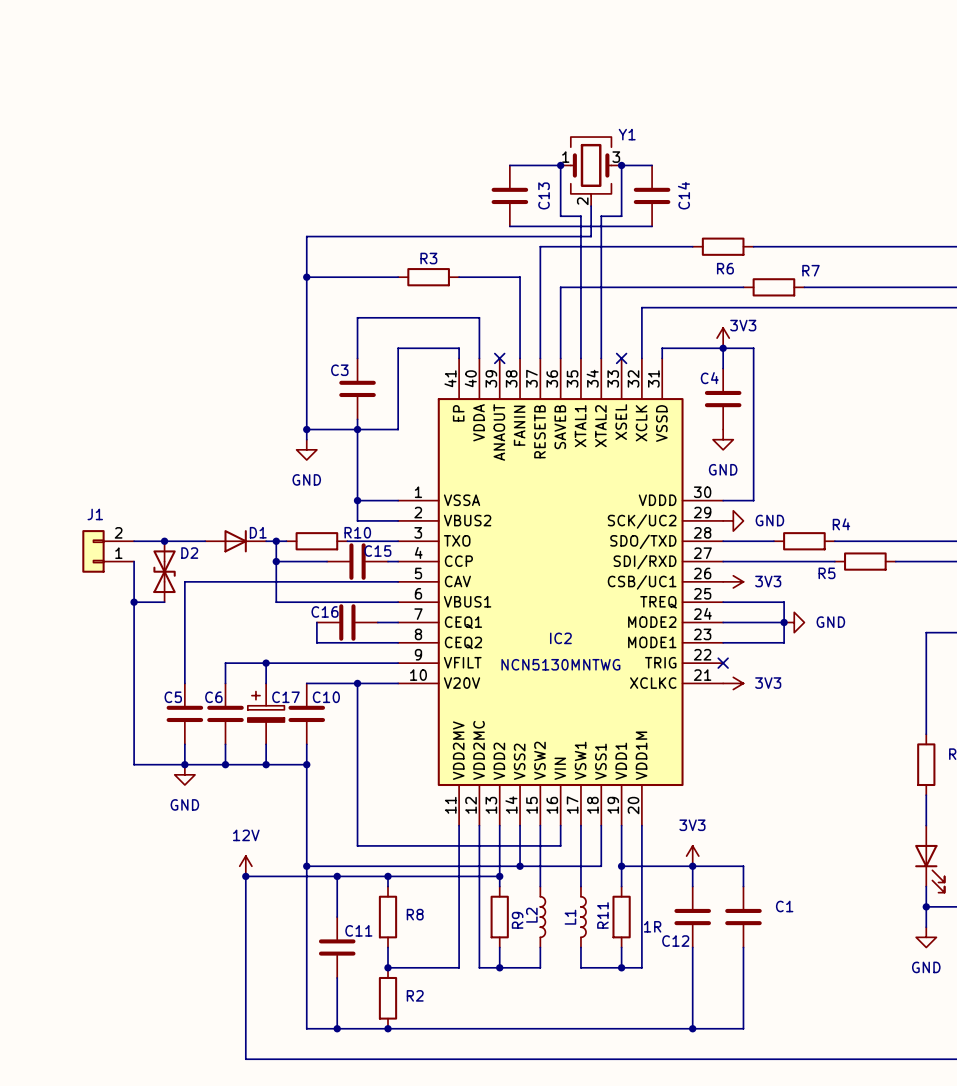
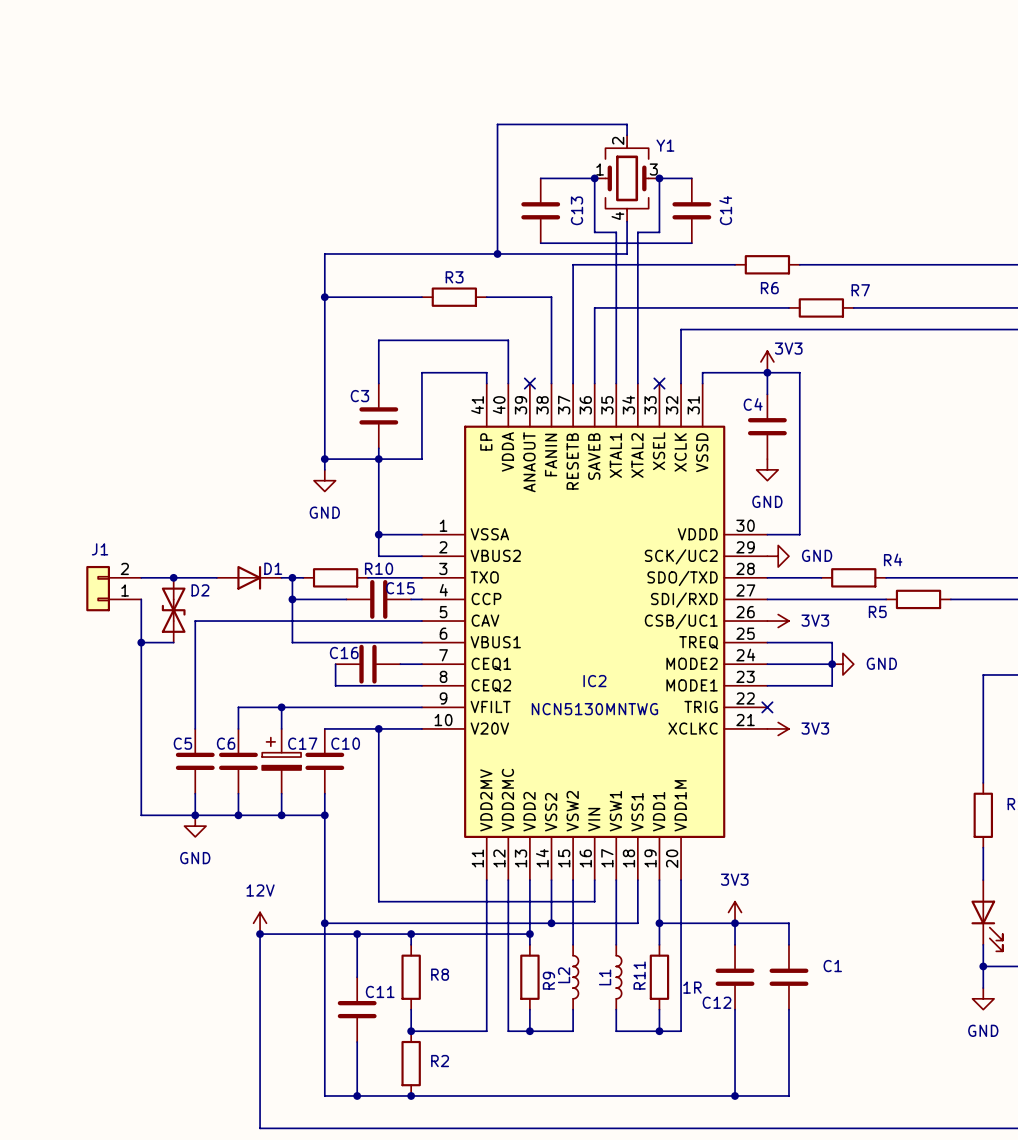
wire: none -> (627, 135) (627, 124) (497, 124) (497, 253)
Y1 symbol: [560, 137, 622, 207] -> [594, 135, 660, 222]
junction: none -> (497, 253)

